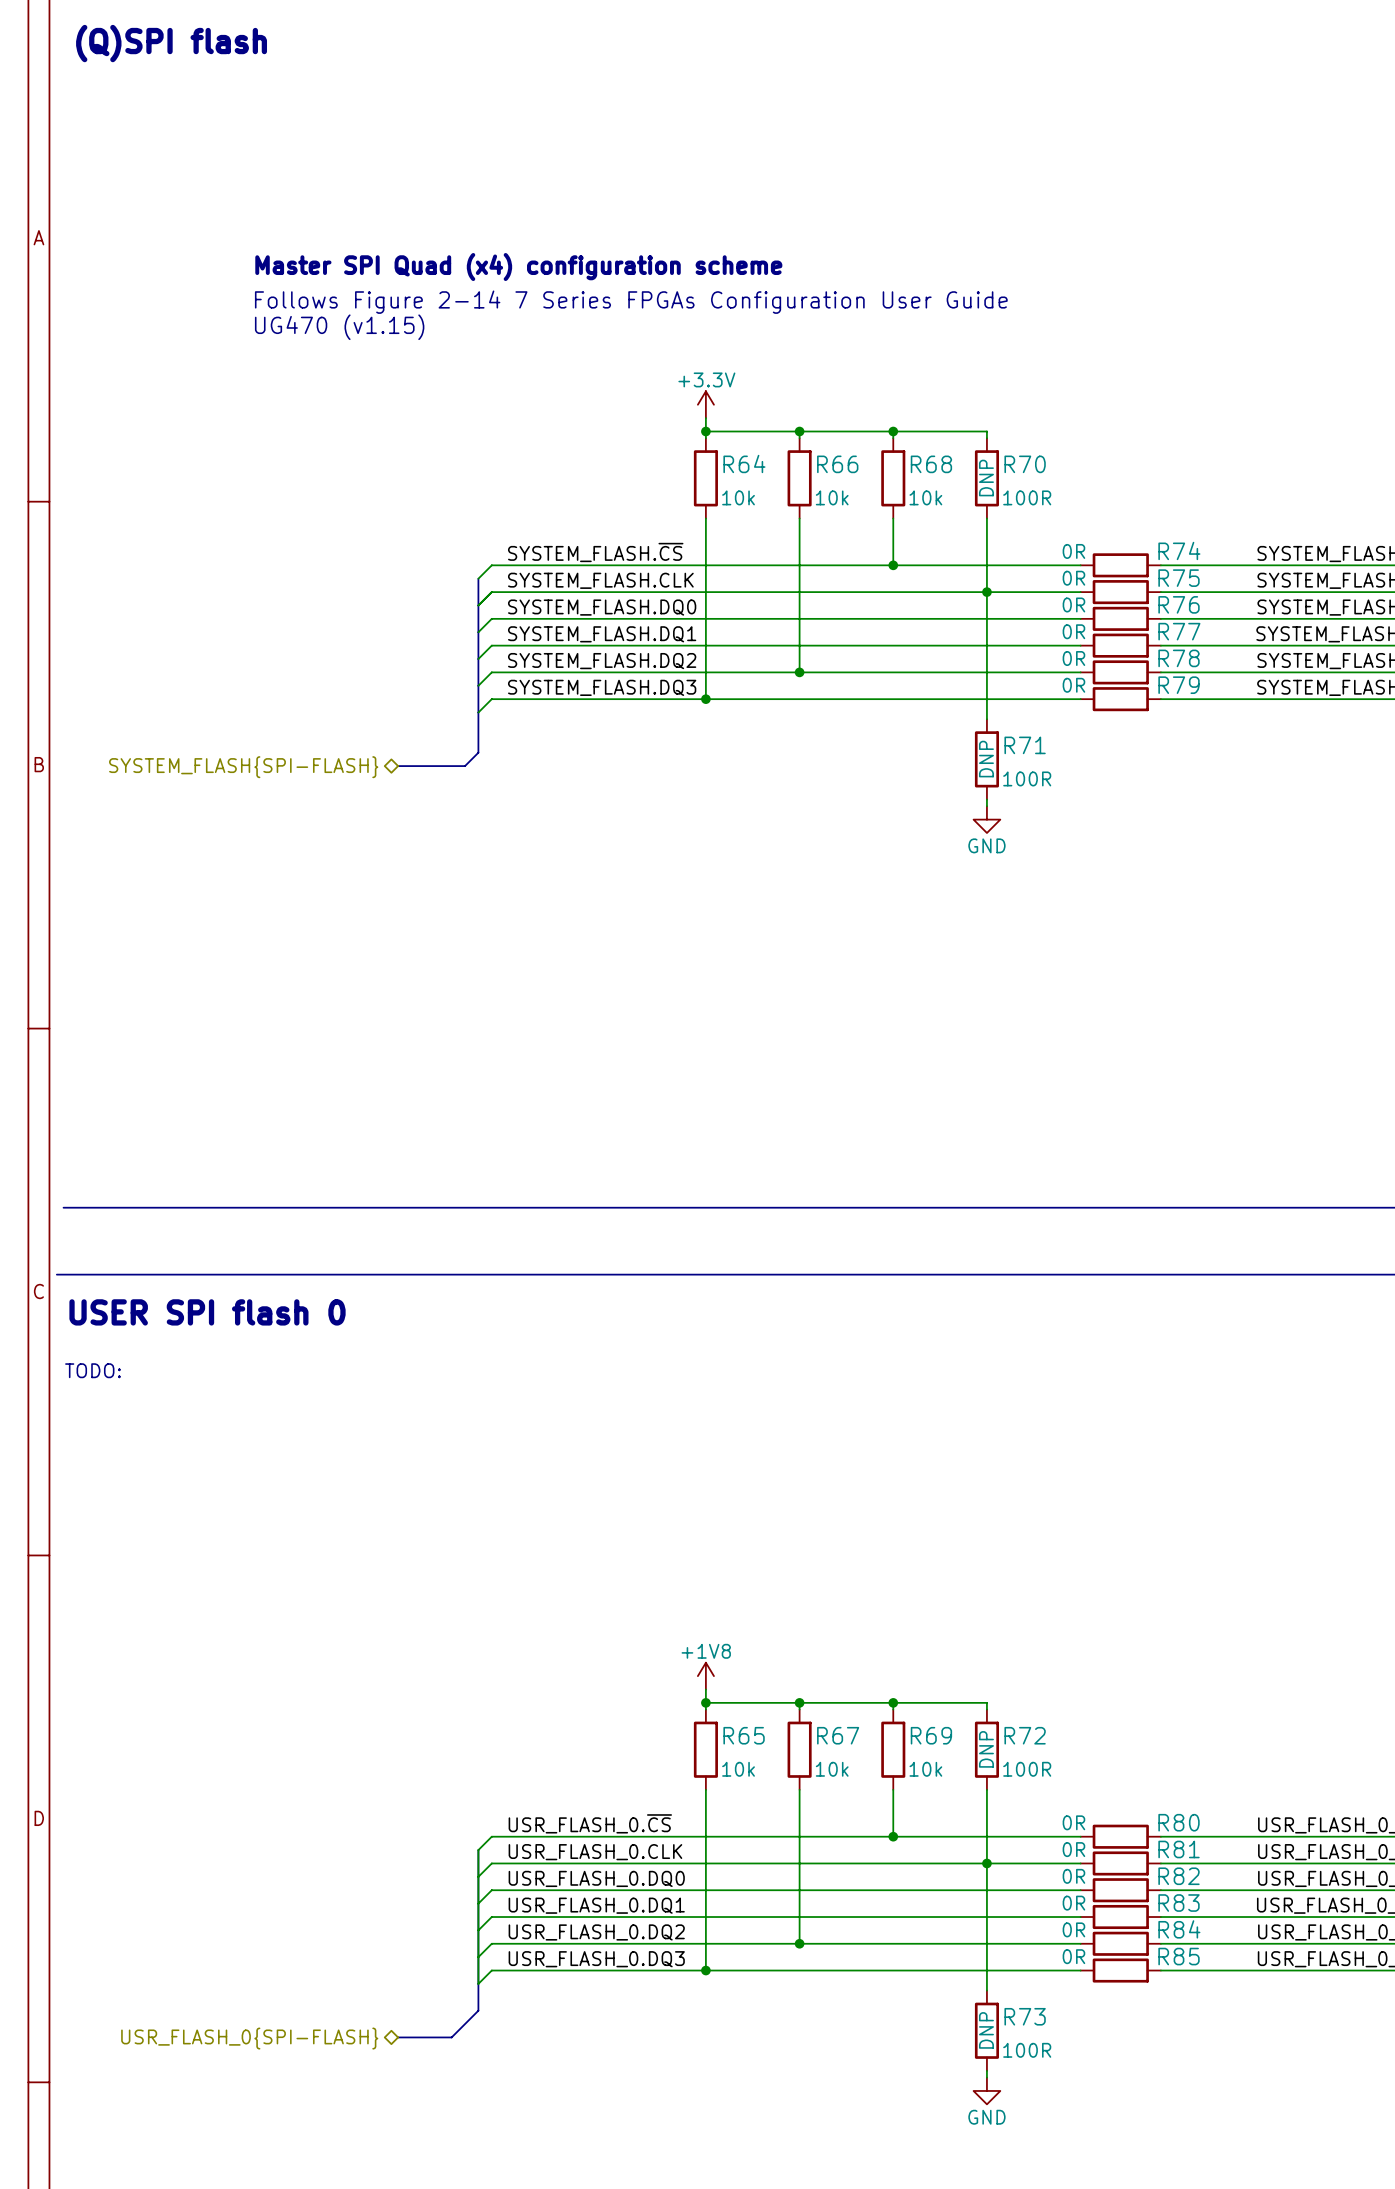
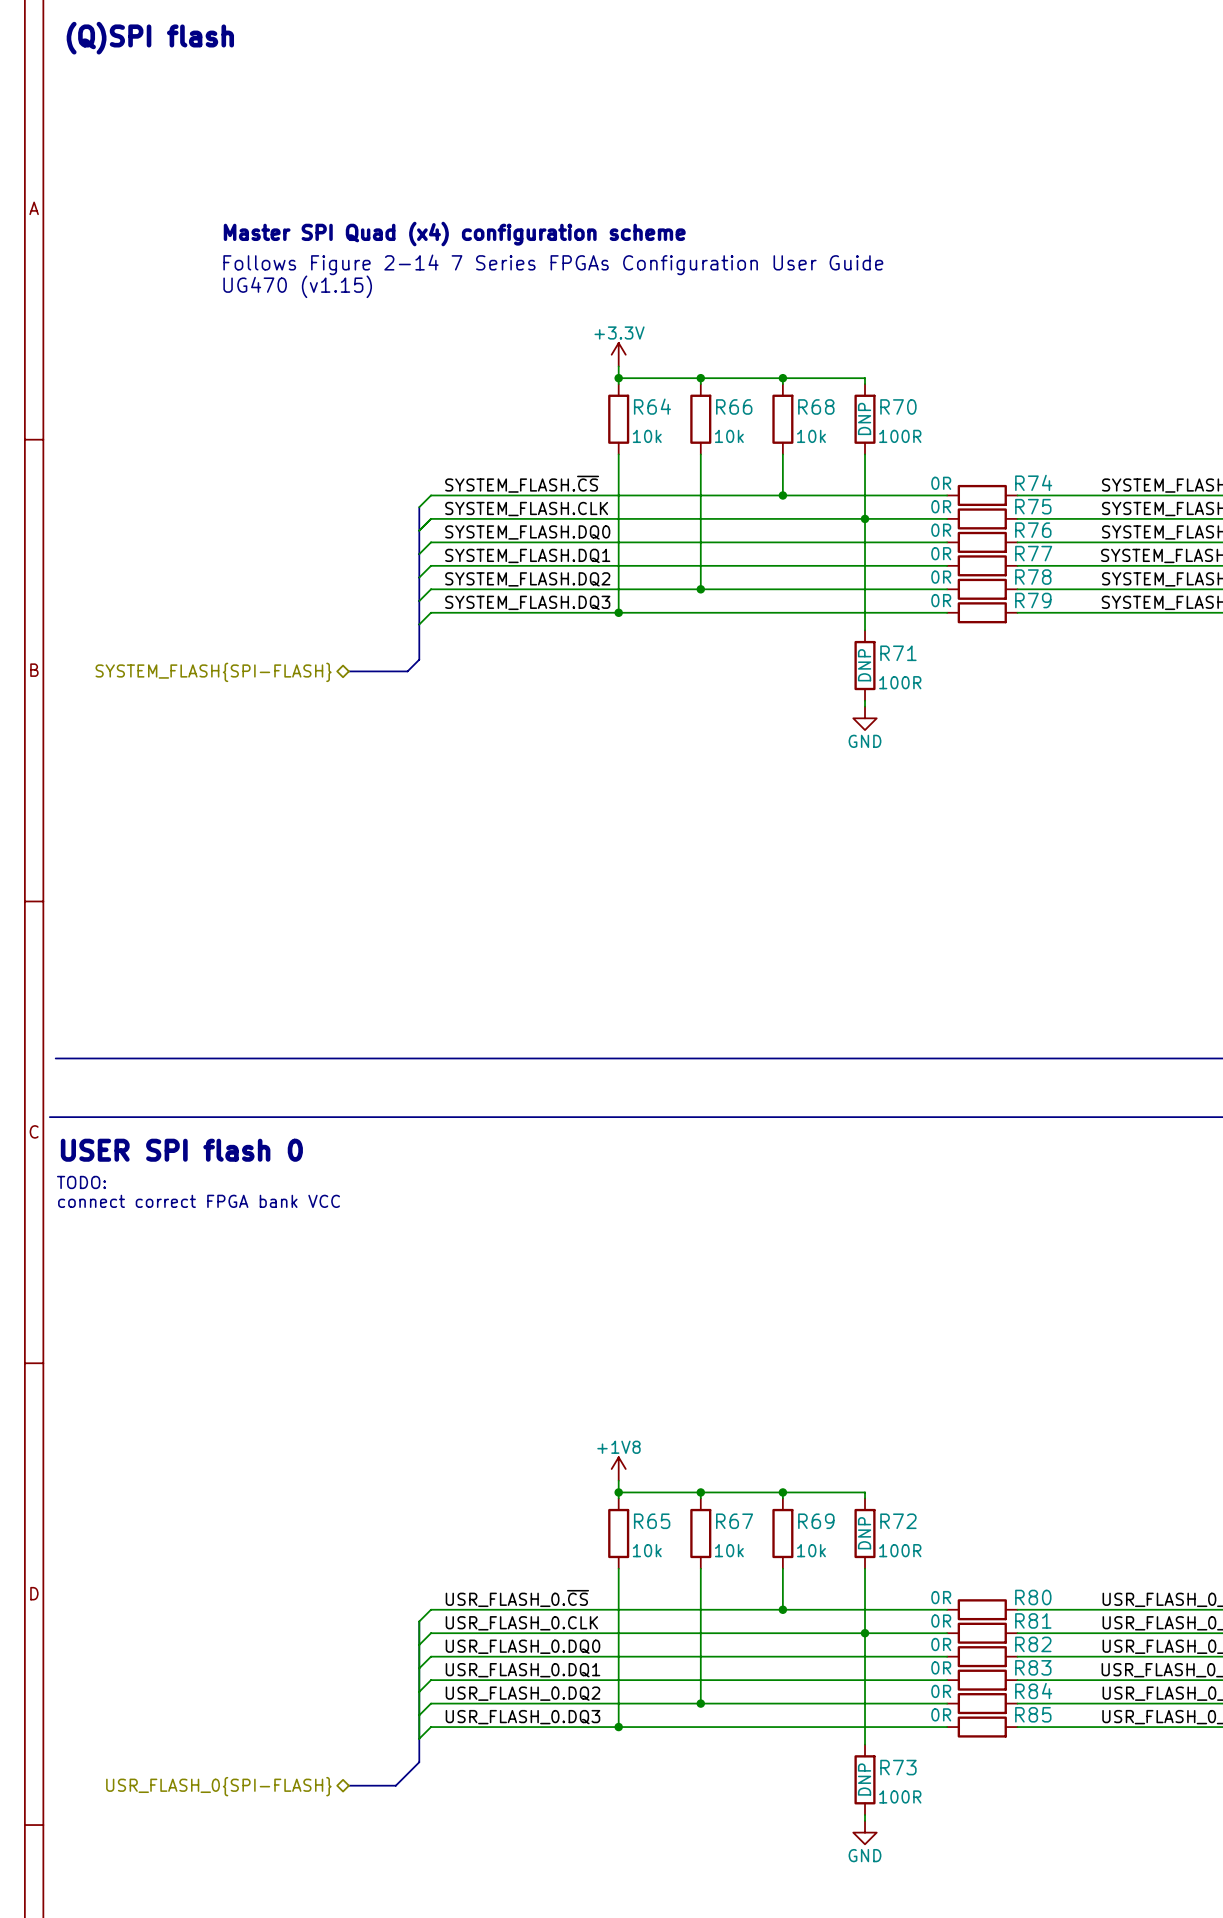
text: none -> TODO: (81, 1182)
text: TODO: (92, 1370) -> connect correct FPGA bank VCC (199, 1201)

